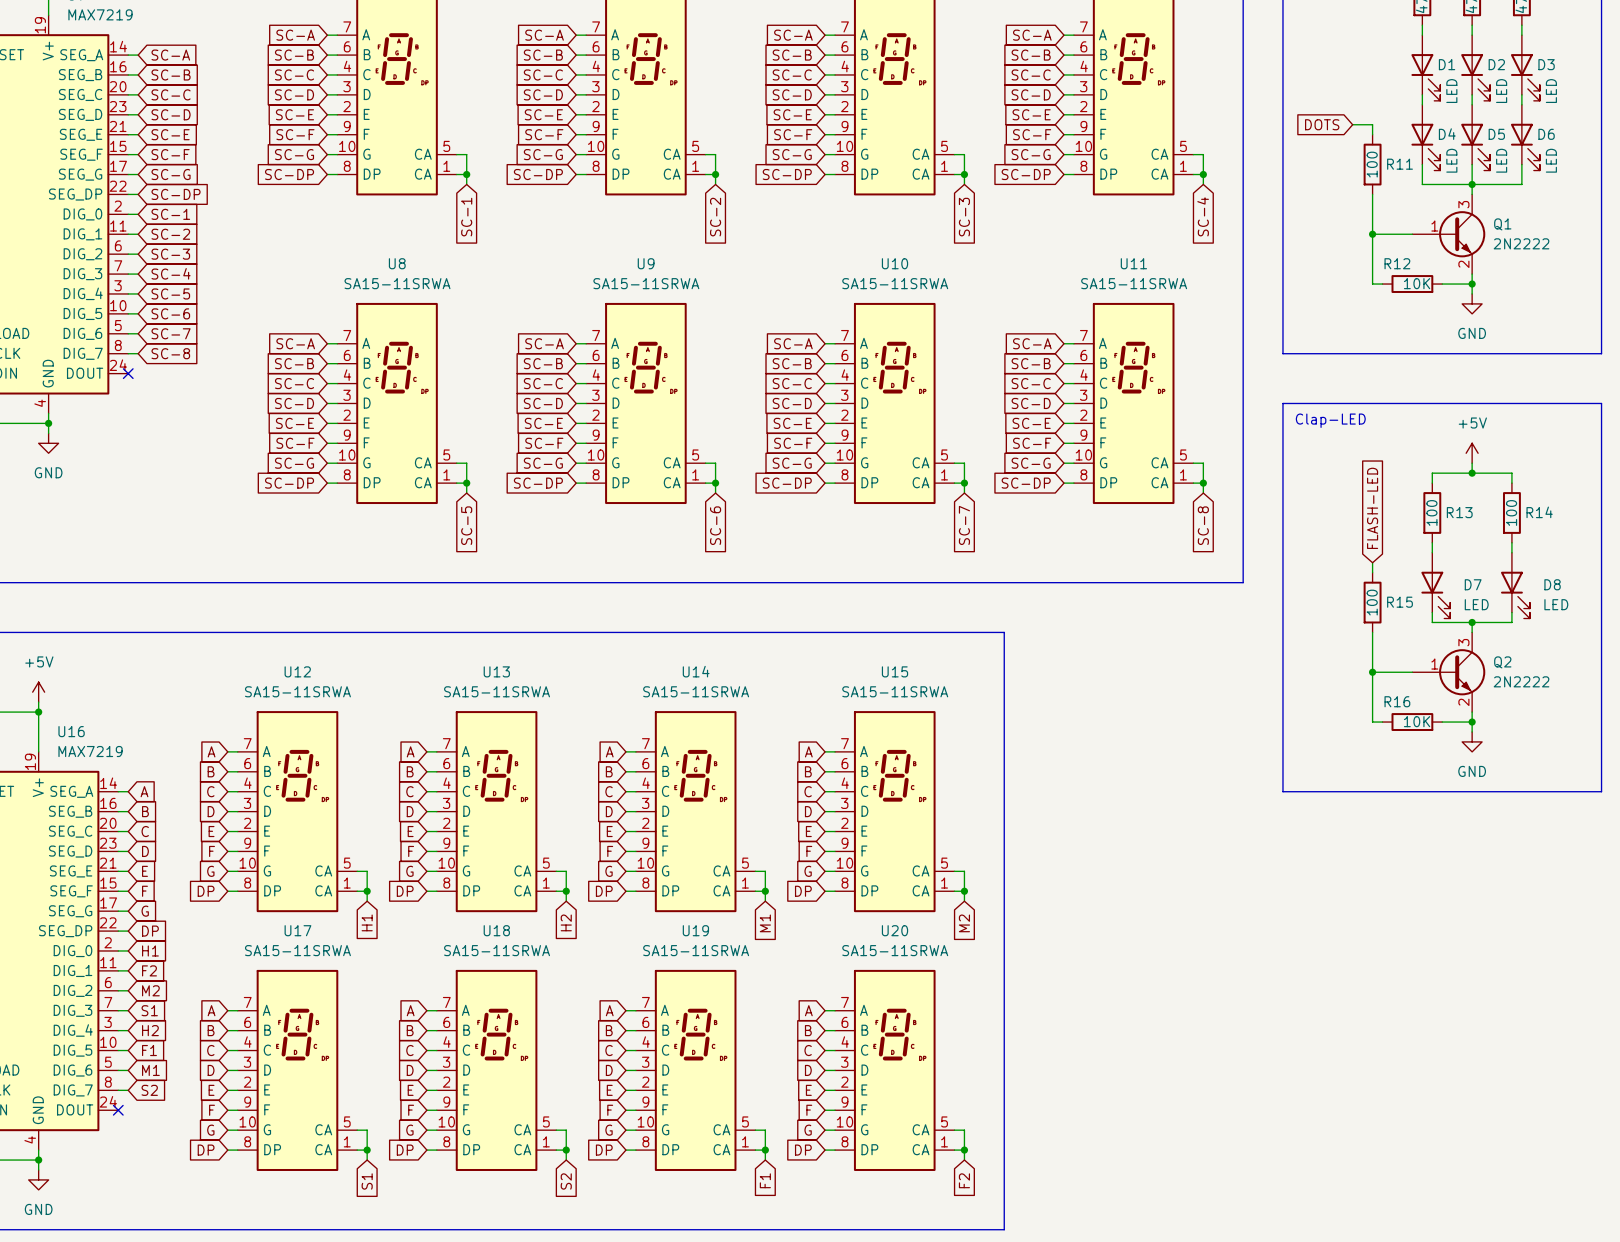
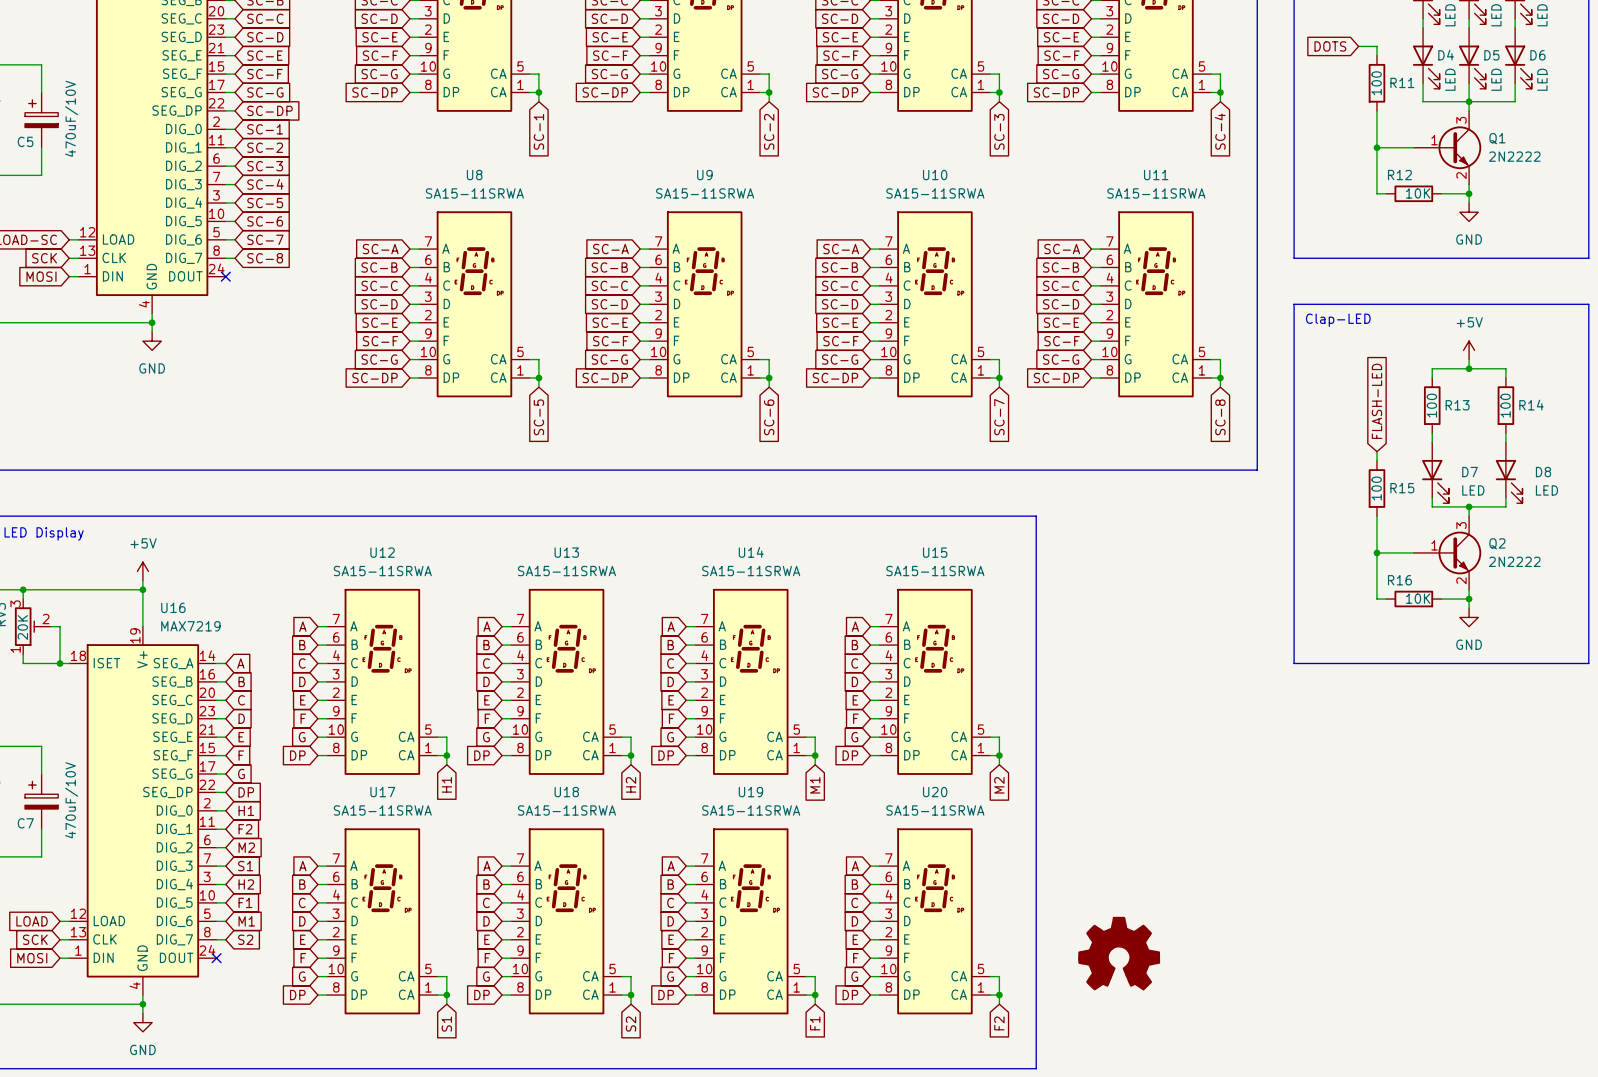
power symbol: none -> (1119, 953)

